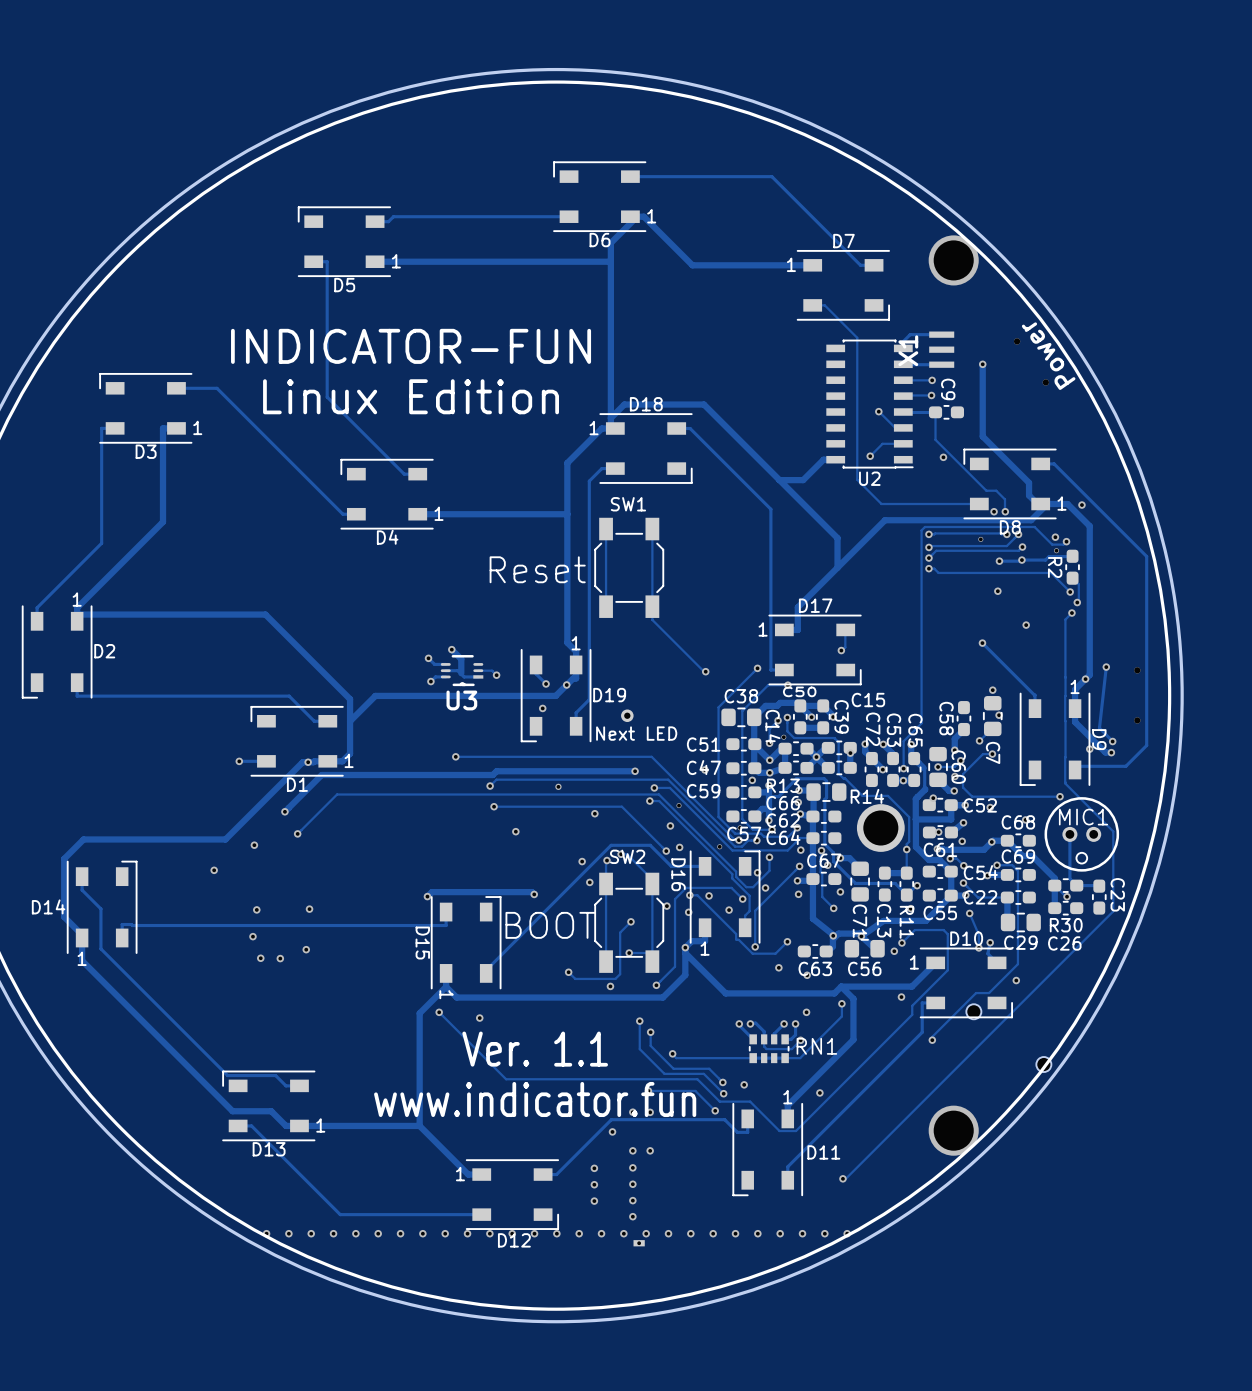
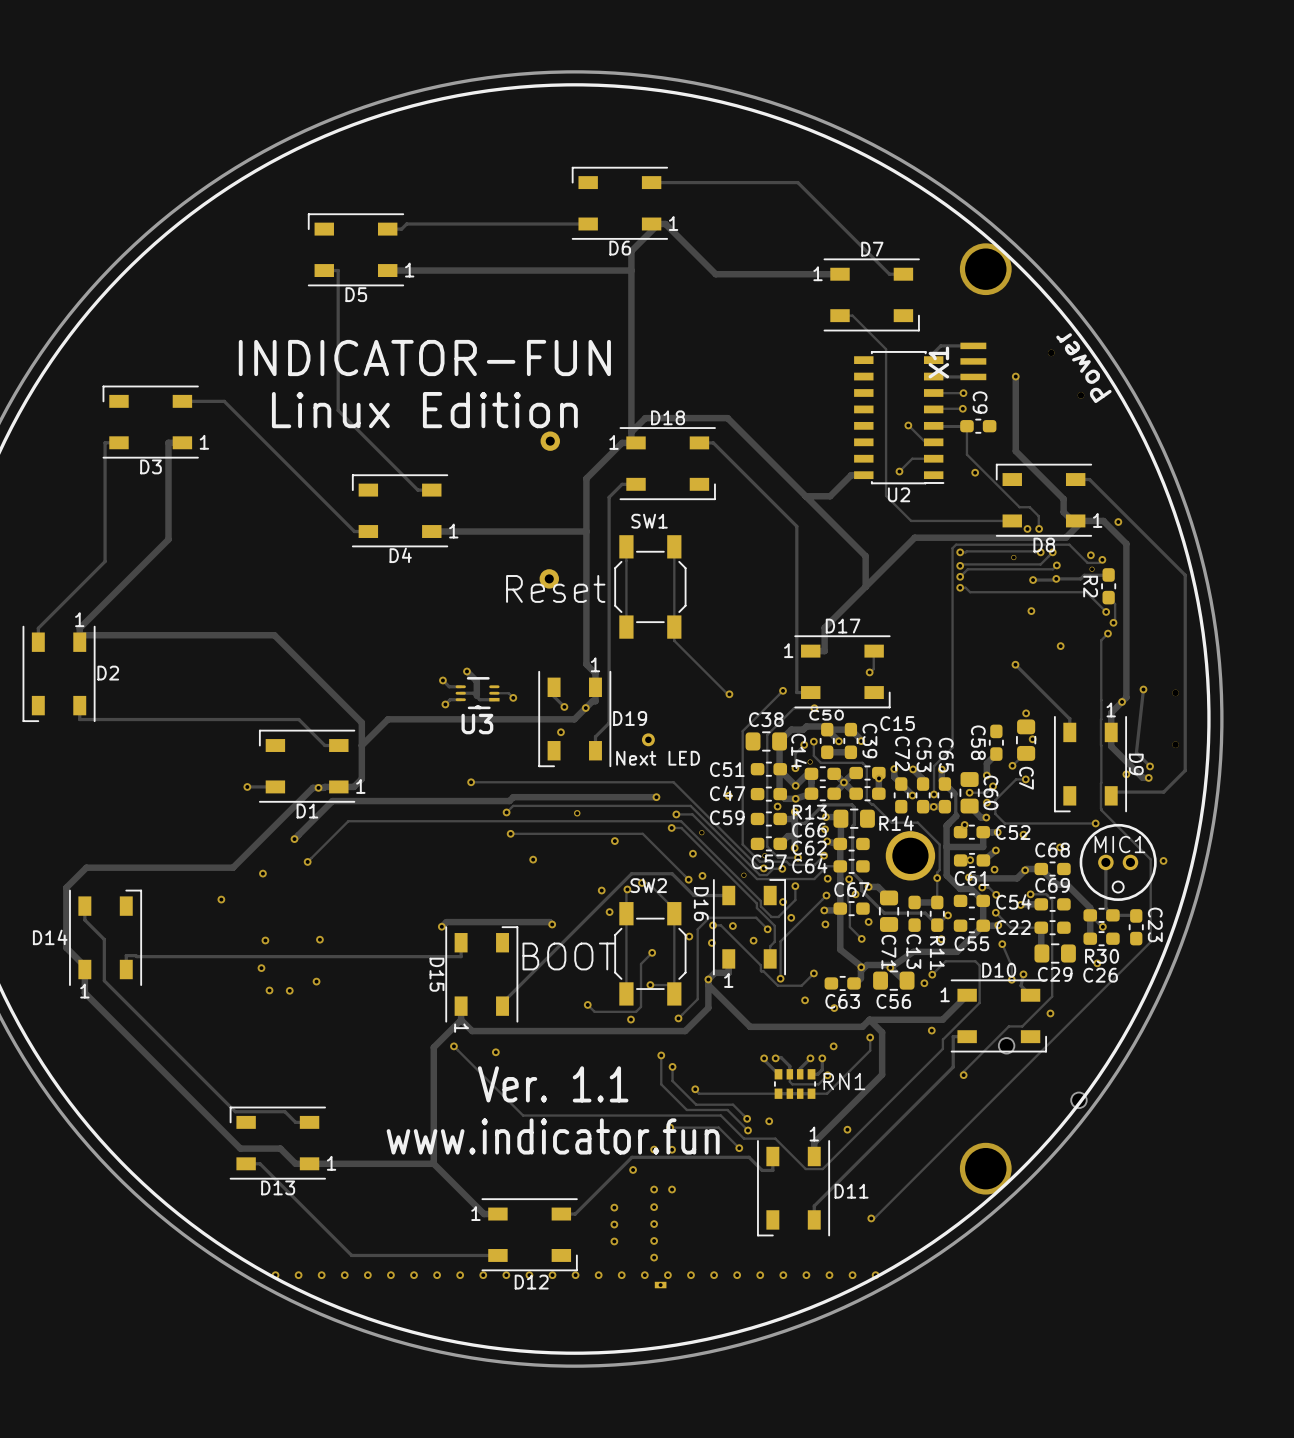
part: none -> (550, 441)
part: none -> (549, 578)
via: none -> (1163, 860)
via: none -> (1097, 963)

